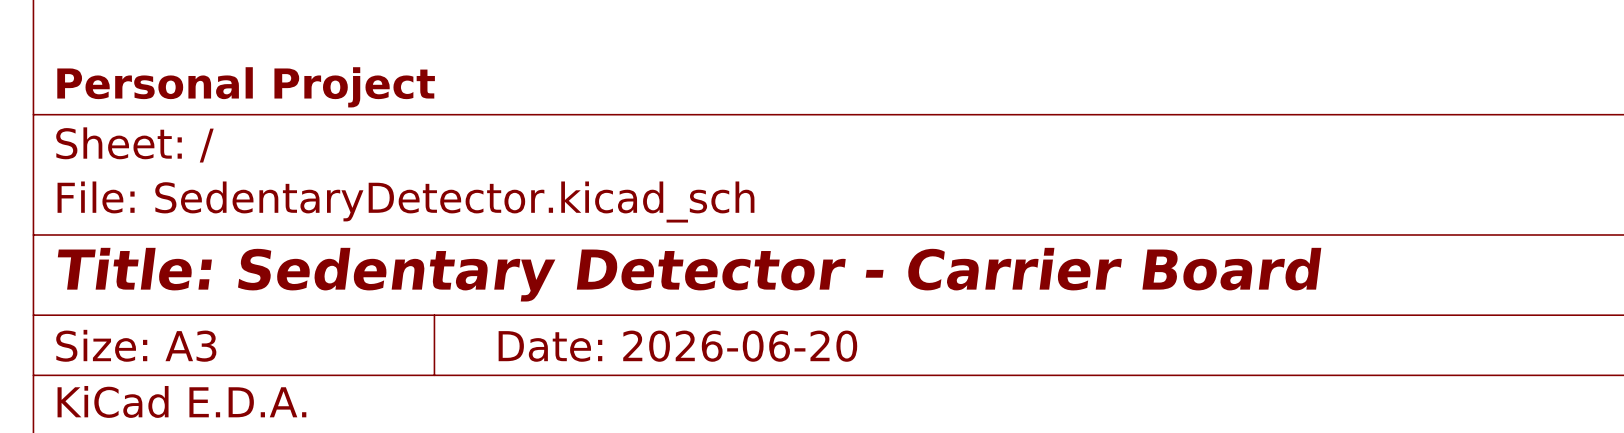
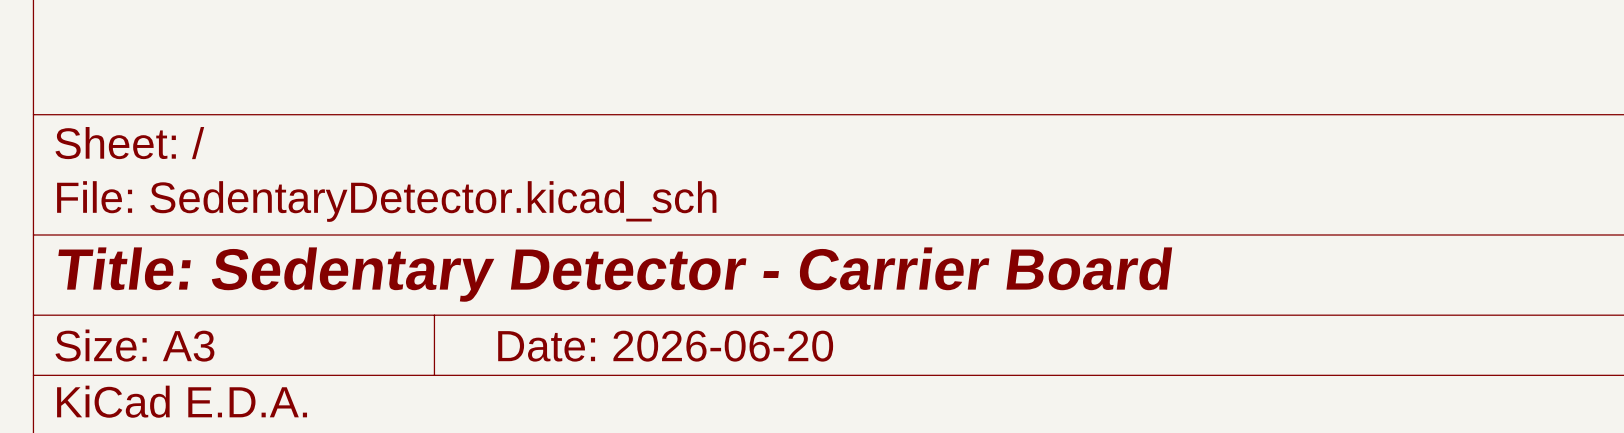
title block: Personal Project (246, 87) -> none

